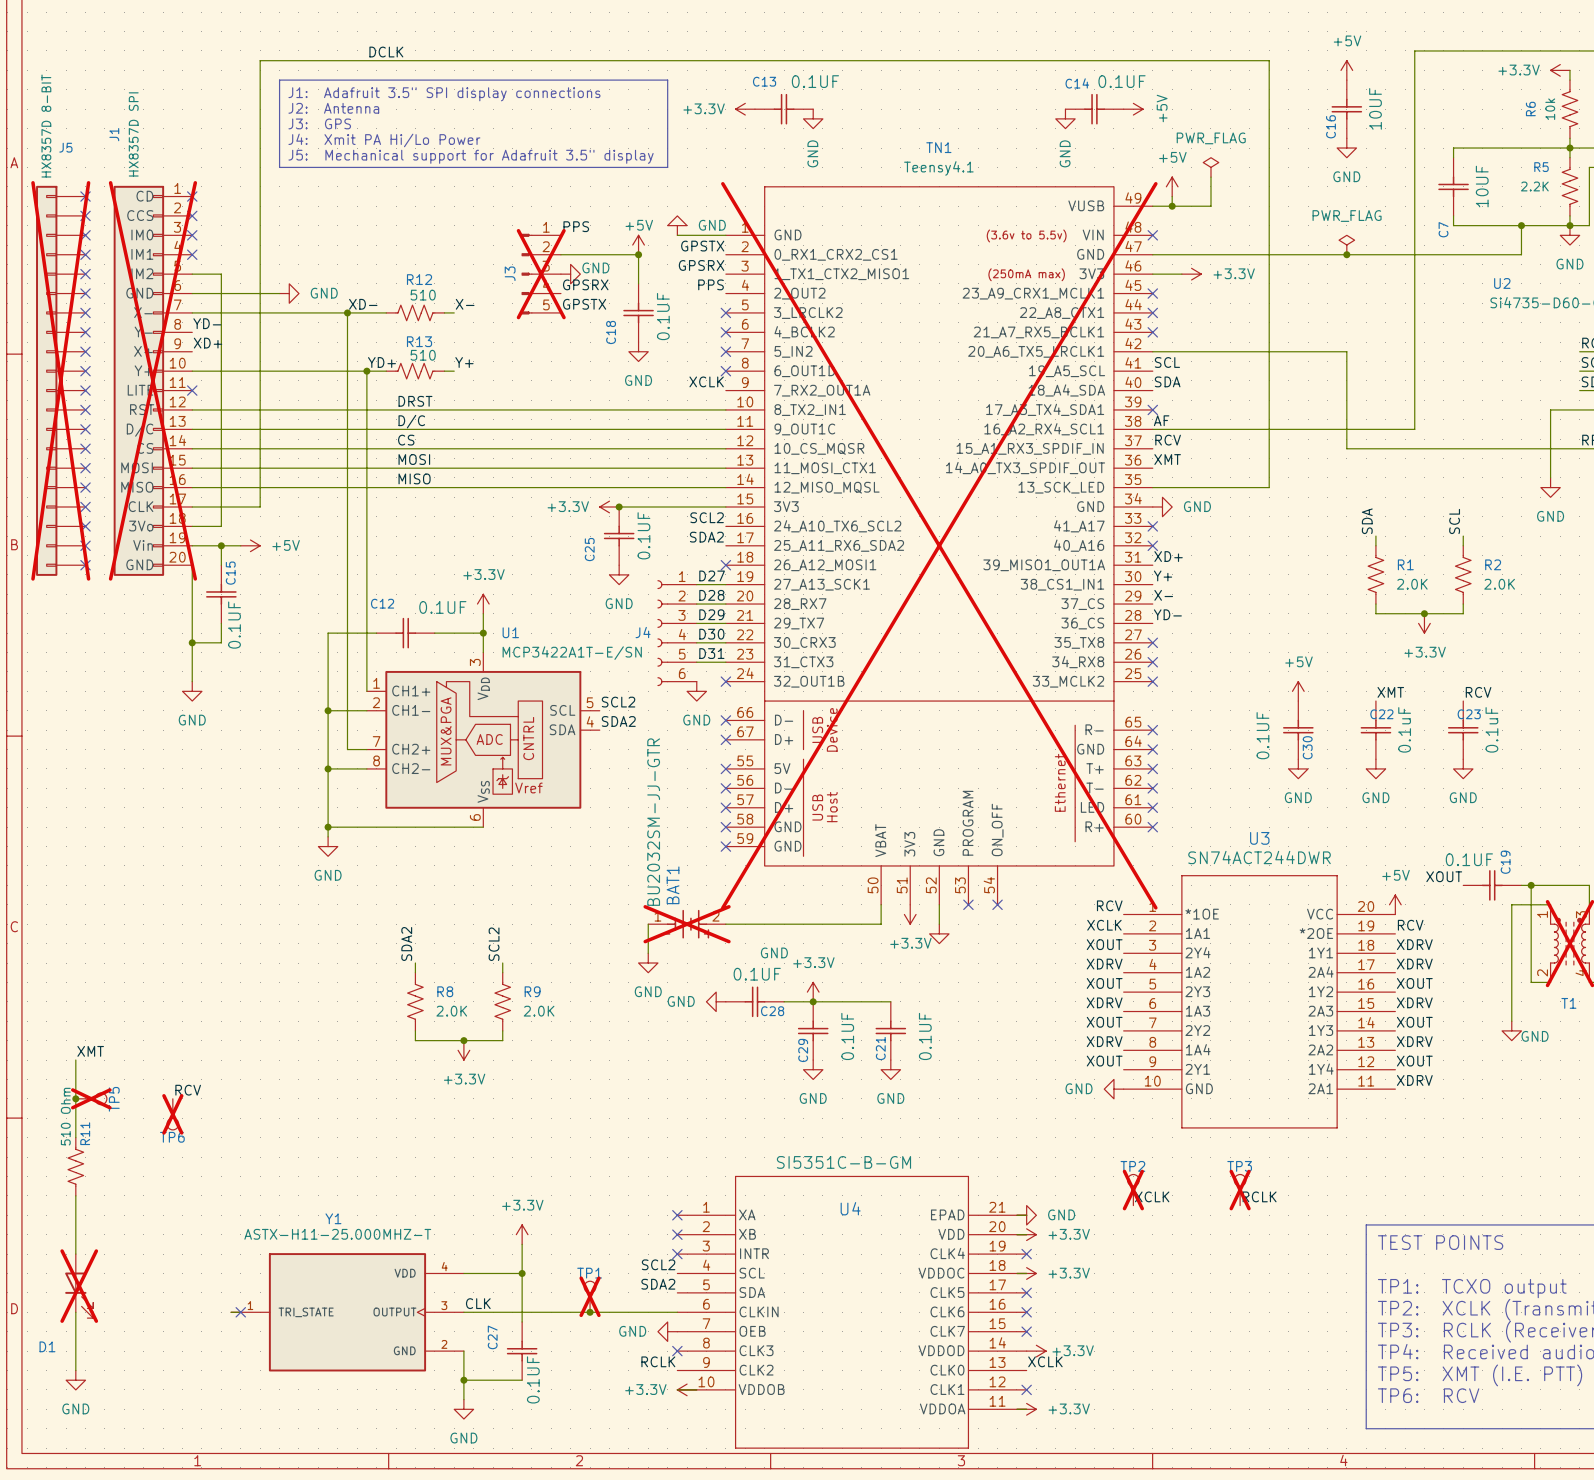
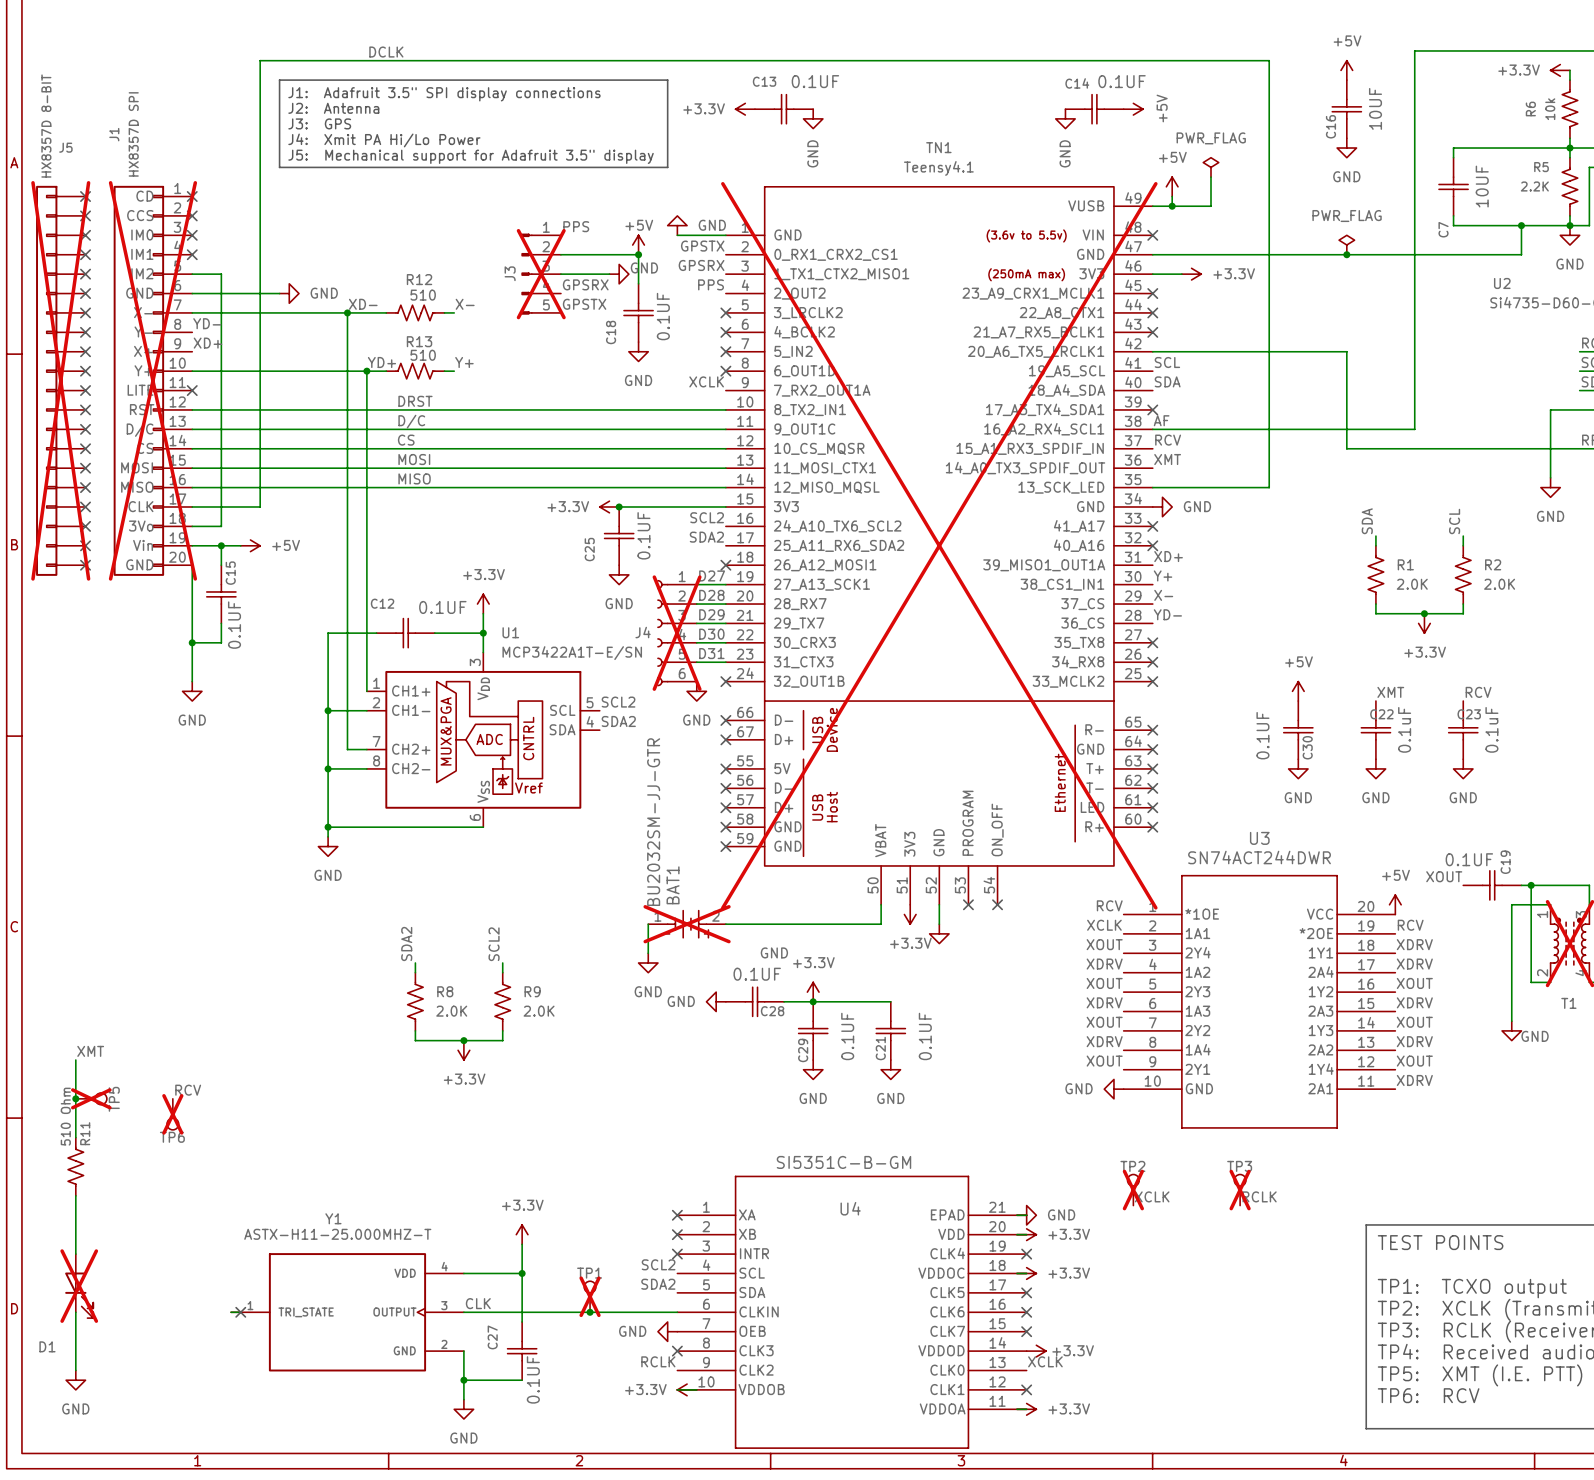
wire: none -> (560, 274) (609, 274)
power symbol position: GND (570, 274) -> GND (619, 274)
J4 do-not-place cross: none -> (677, 633)

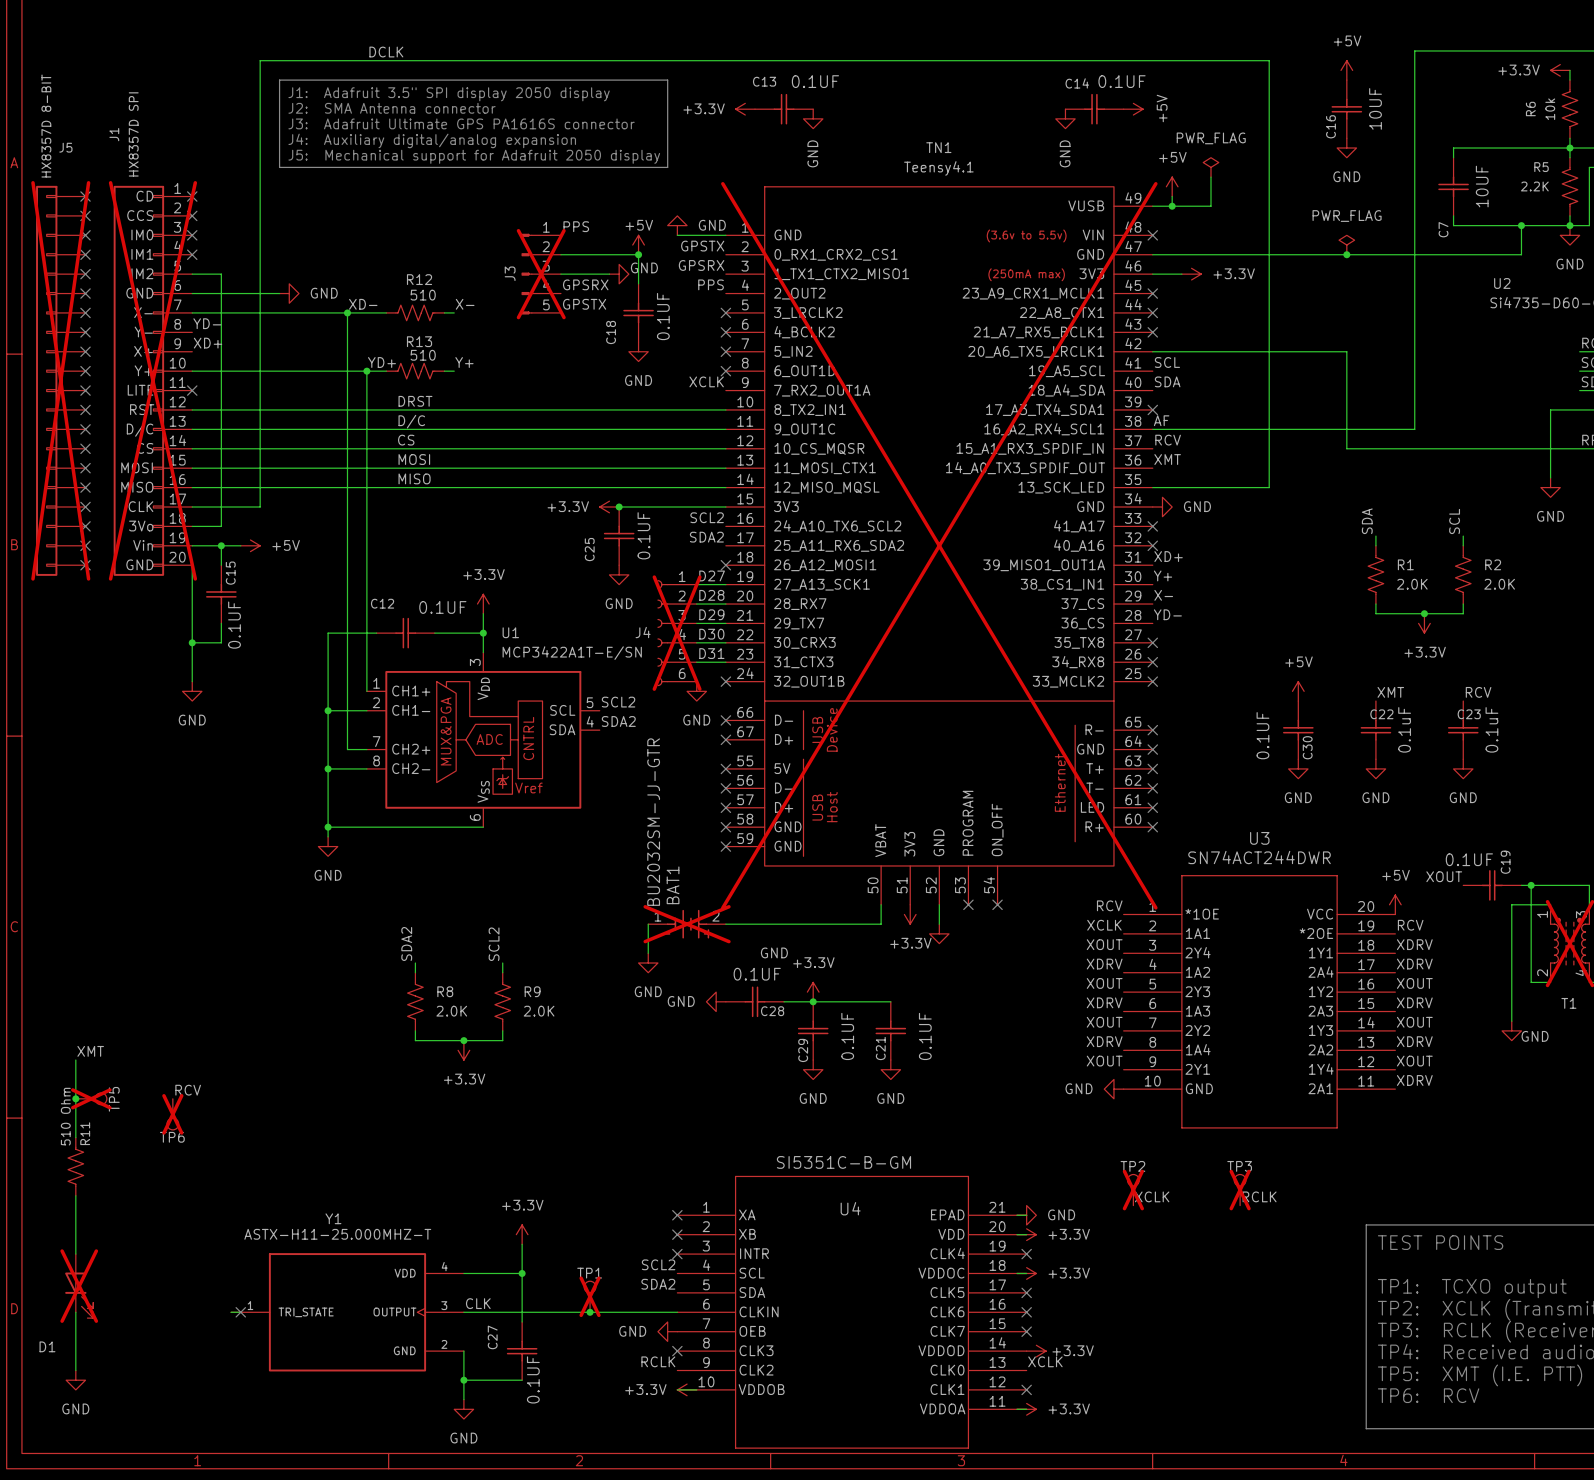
text: J1: Adafruit 3.5" SPI display connections (444, 94) -> J1: Adafruit 3.5" SPI display 2050 display (449, 94)
text: J2: Antenna (333, 108) -> J2: SMA Antenna connector (392, 108)
text: J3: GPS (319, 123) -> J3: Adafruit Ultimate GPS PA1616S connector (461, 123)
text: J4: Xmit PA Hi/Lo Power (384, 140) -> J4: Auxiliary digital/analog expansion (432, 140)
text: J5: Mechanical support for Adafruit 3.5" display (471, 156) -> J5: Mechanical support for Adafruit 2050 display (474, 156)

